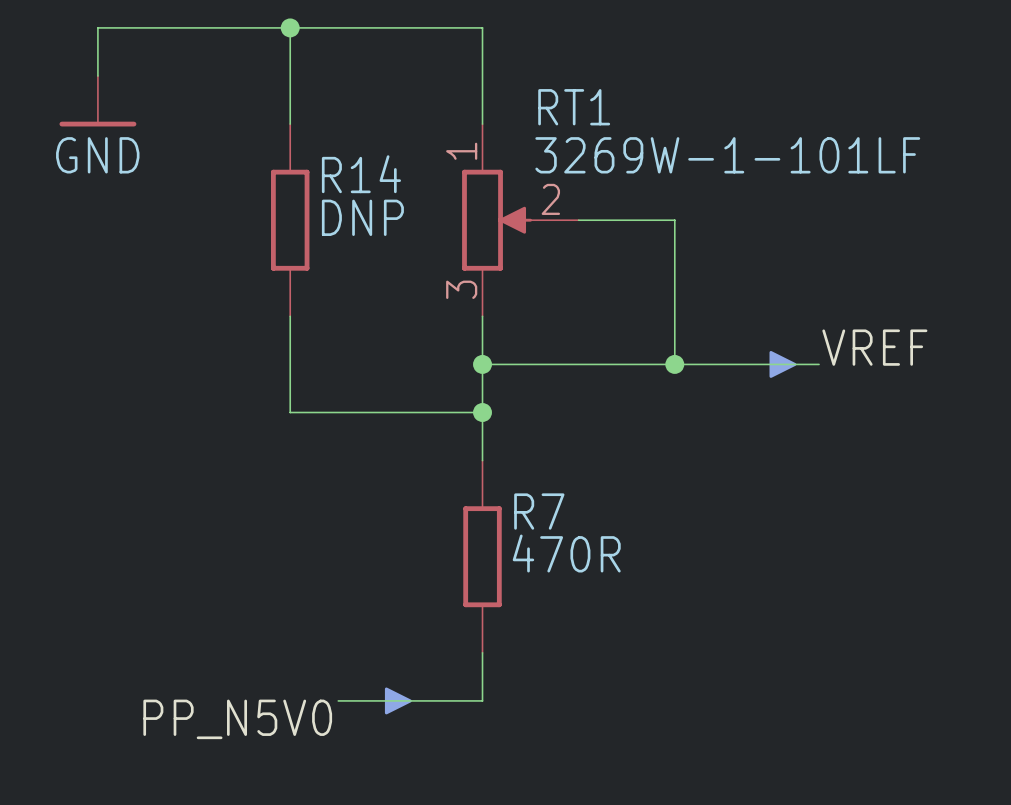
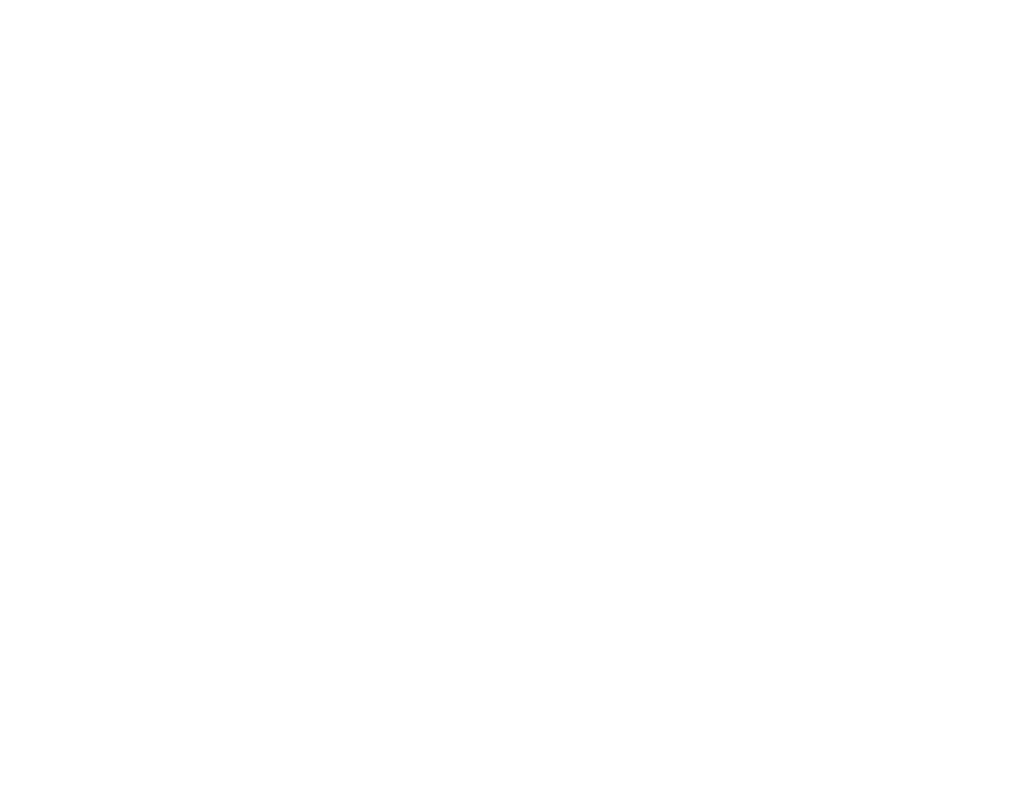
wire: (290, 27) (290, 124) -> none
junction: (290, 27) -> none
wire: (97, 75) (97, 27) (482, 27) (482, 124) -> none
power symbol: GND (97, 101) -> none
R14: DNP (290, 220) -> none
RT1: 3269W-1-101LF (520, 220) -> none
wire: (578, 220) (674, 220) (674, 364) -> none
wire: (290, 316) (290, 412) (482, 412) -> none
wire: (482, 316) (482, 460) -> none
label: VREF (874, 347) -> none
wire: (482, 364) (819, 364) -> none
junction: (482, 364) -> none
junction: (674, 364) -> none
part: (782, 364) -> none
junction: (482, 412) -> none
R7: 470R (482, 556) -> none
wire: (482, 652) (482, 700) (338, 700) -> none
part: (398, 700) -> none
label: PP_N5V0 (237, 719) -> none

